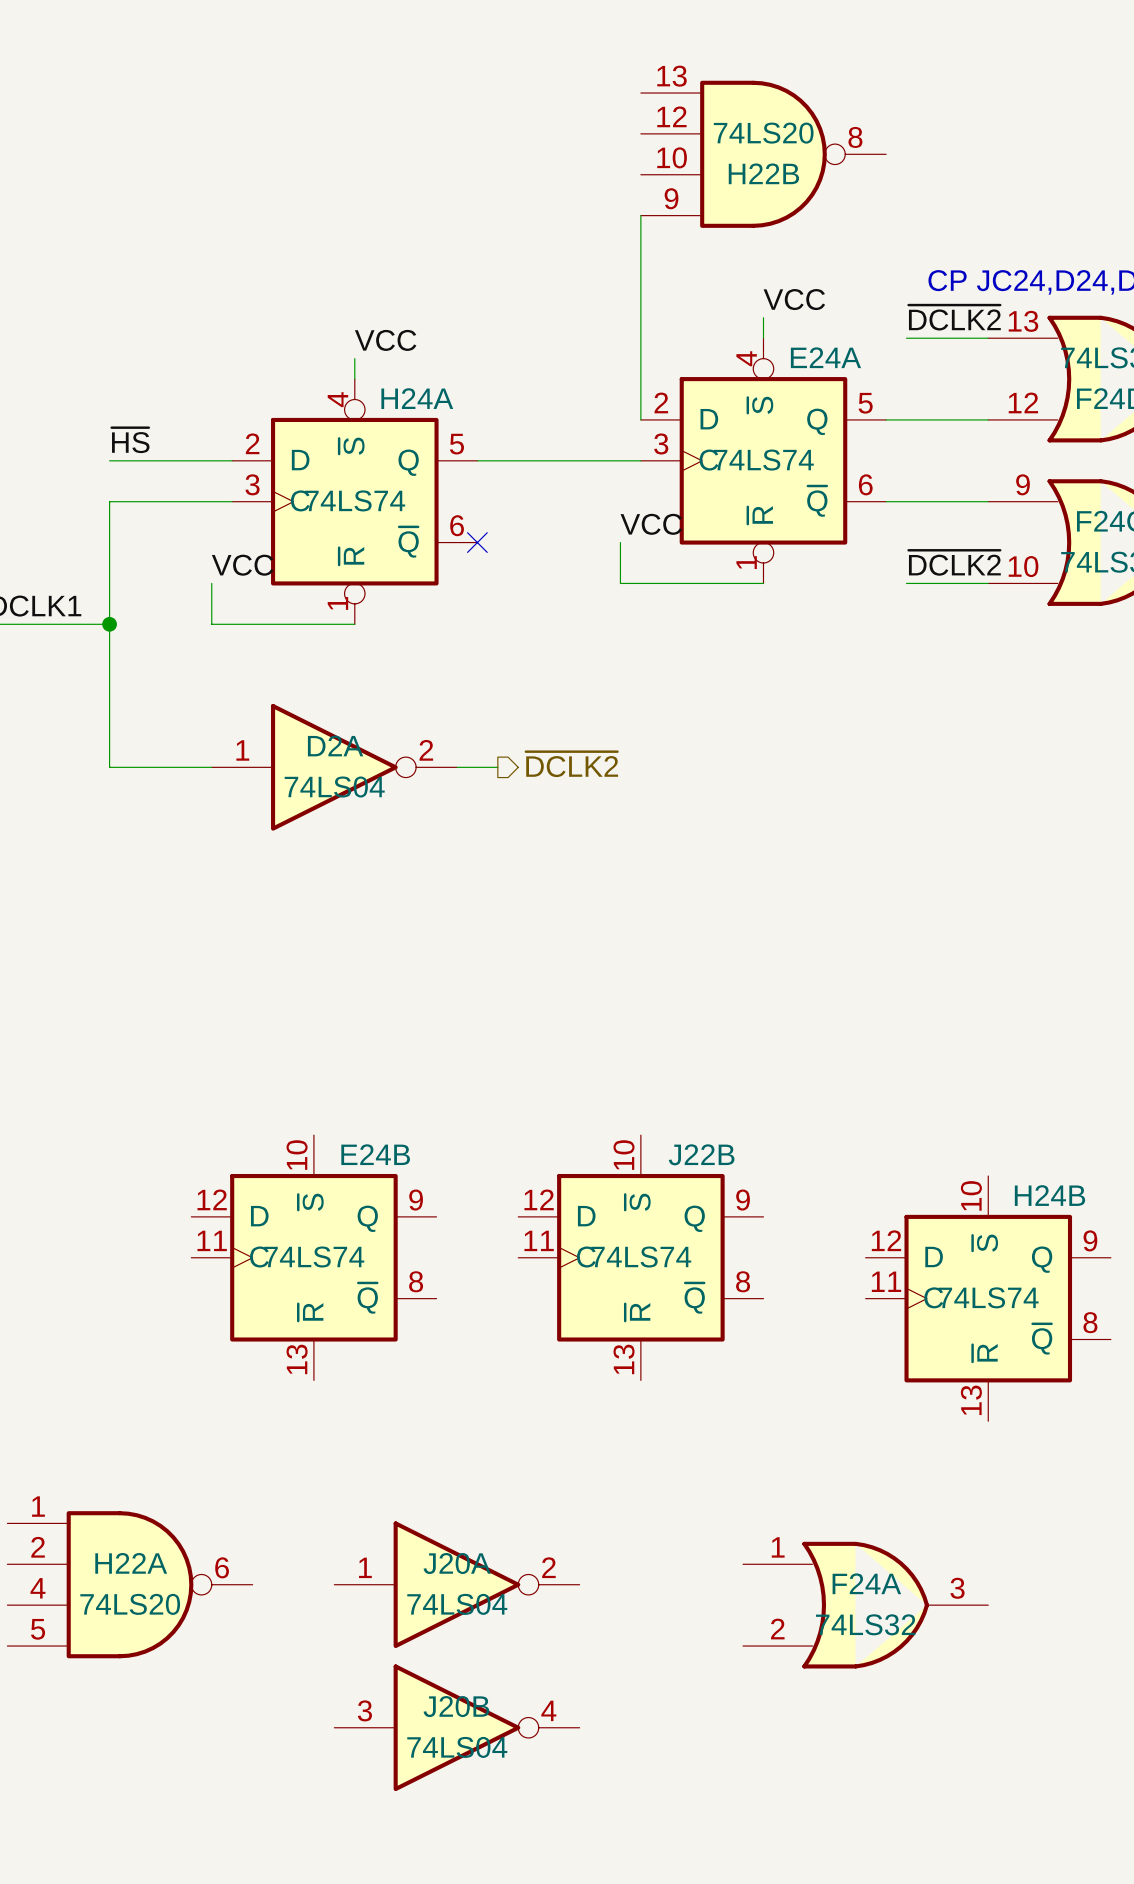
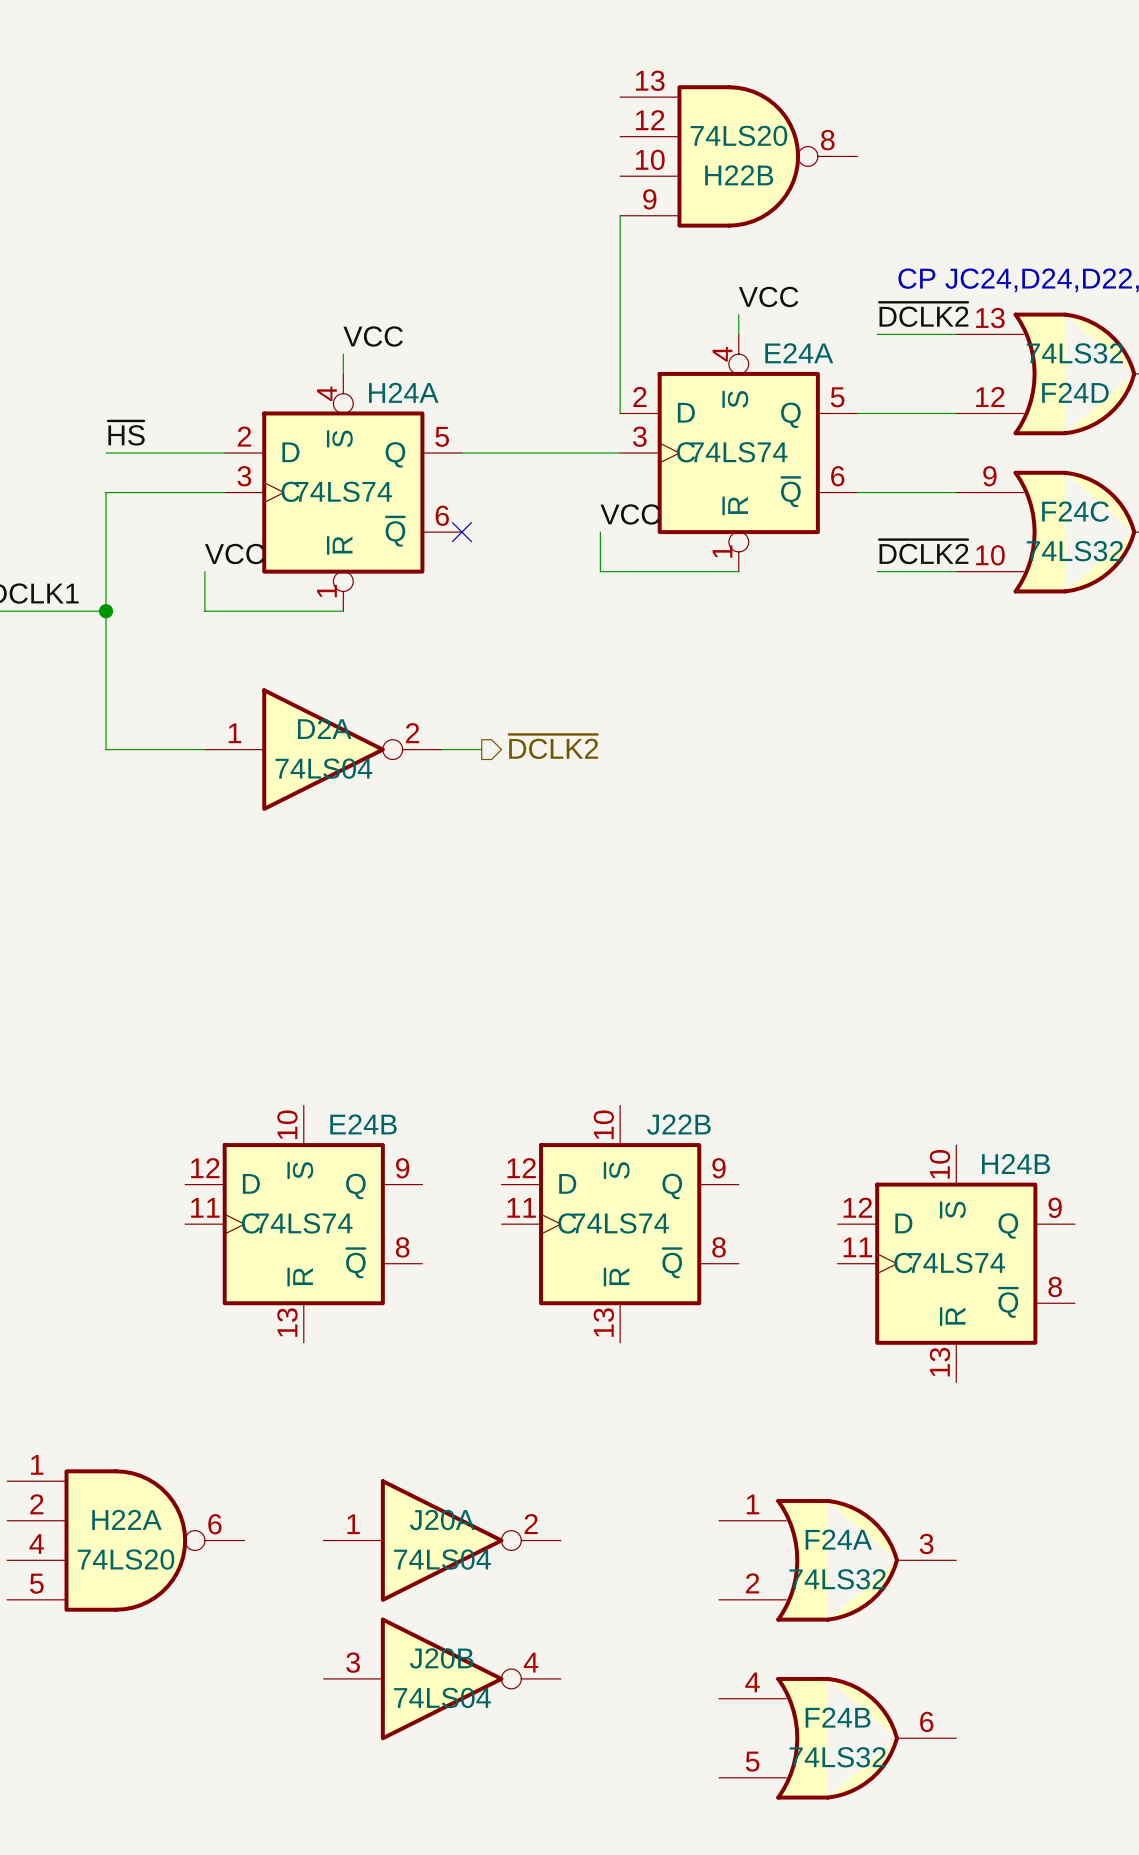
F24B: none -> 74LS32 (837, 1738)

